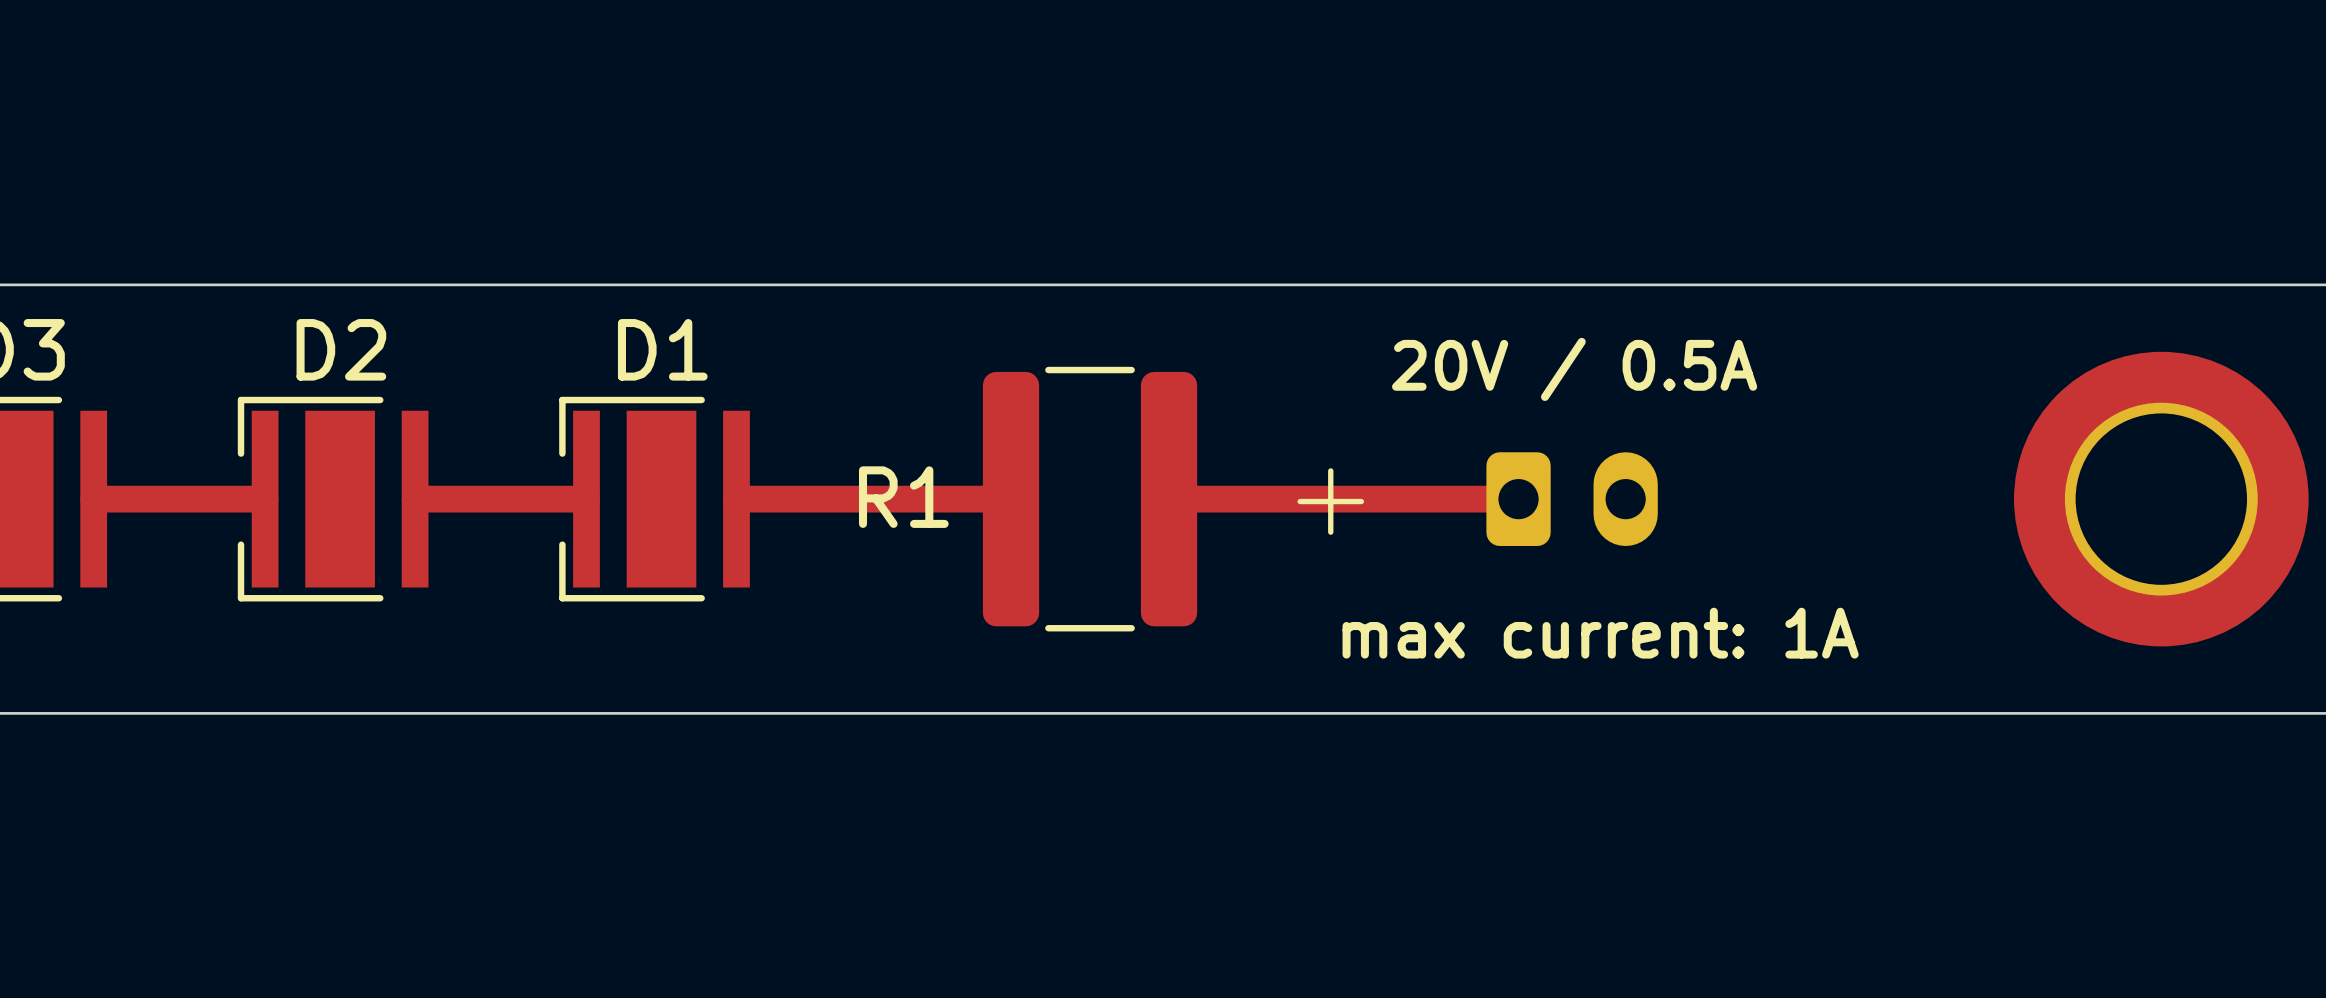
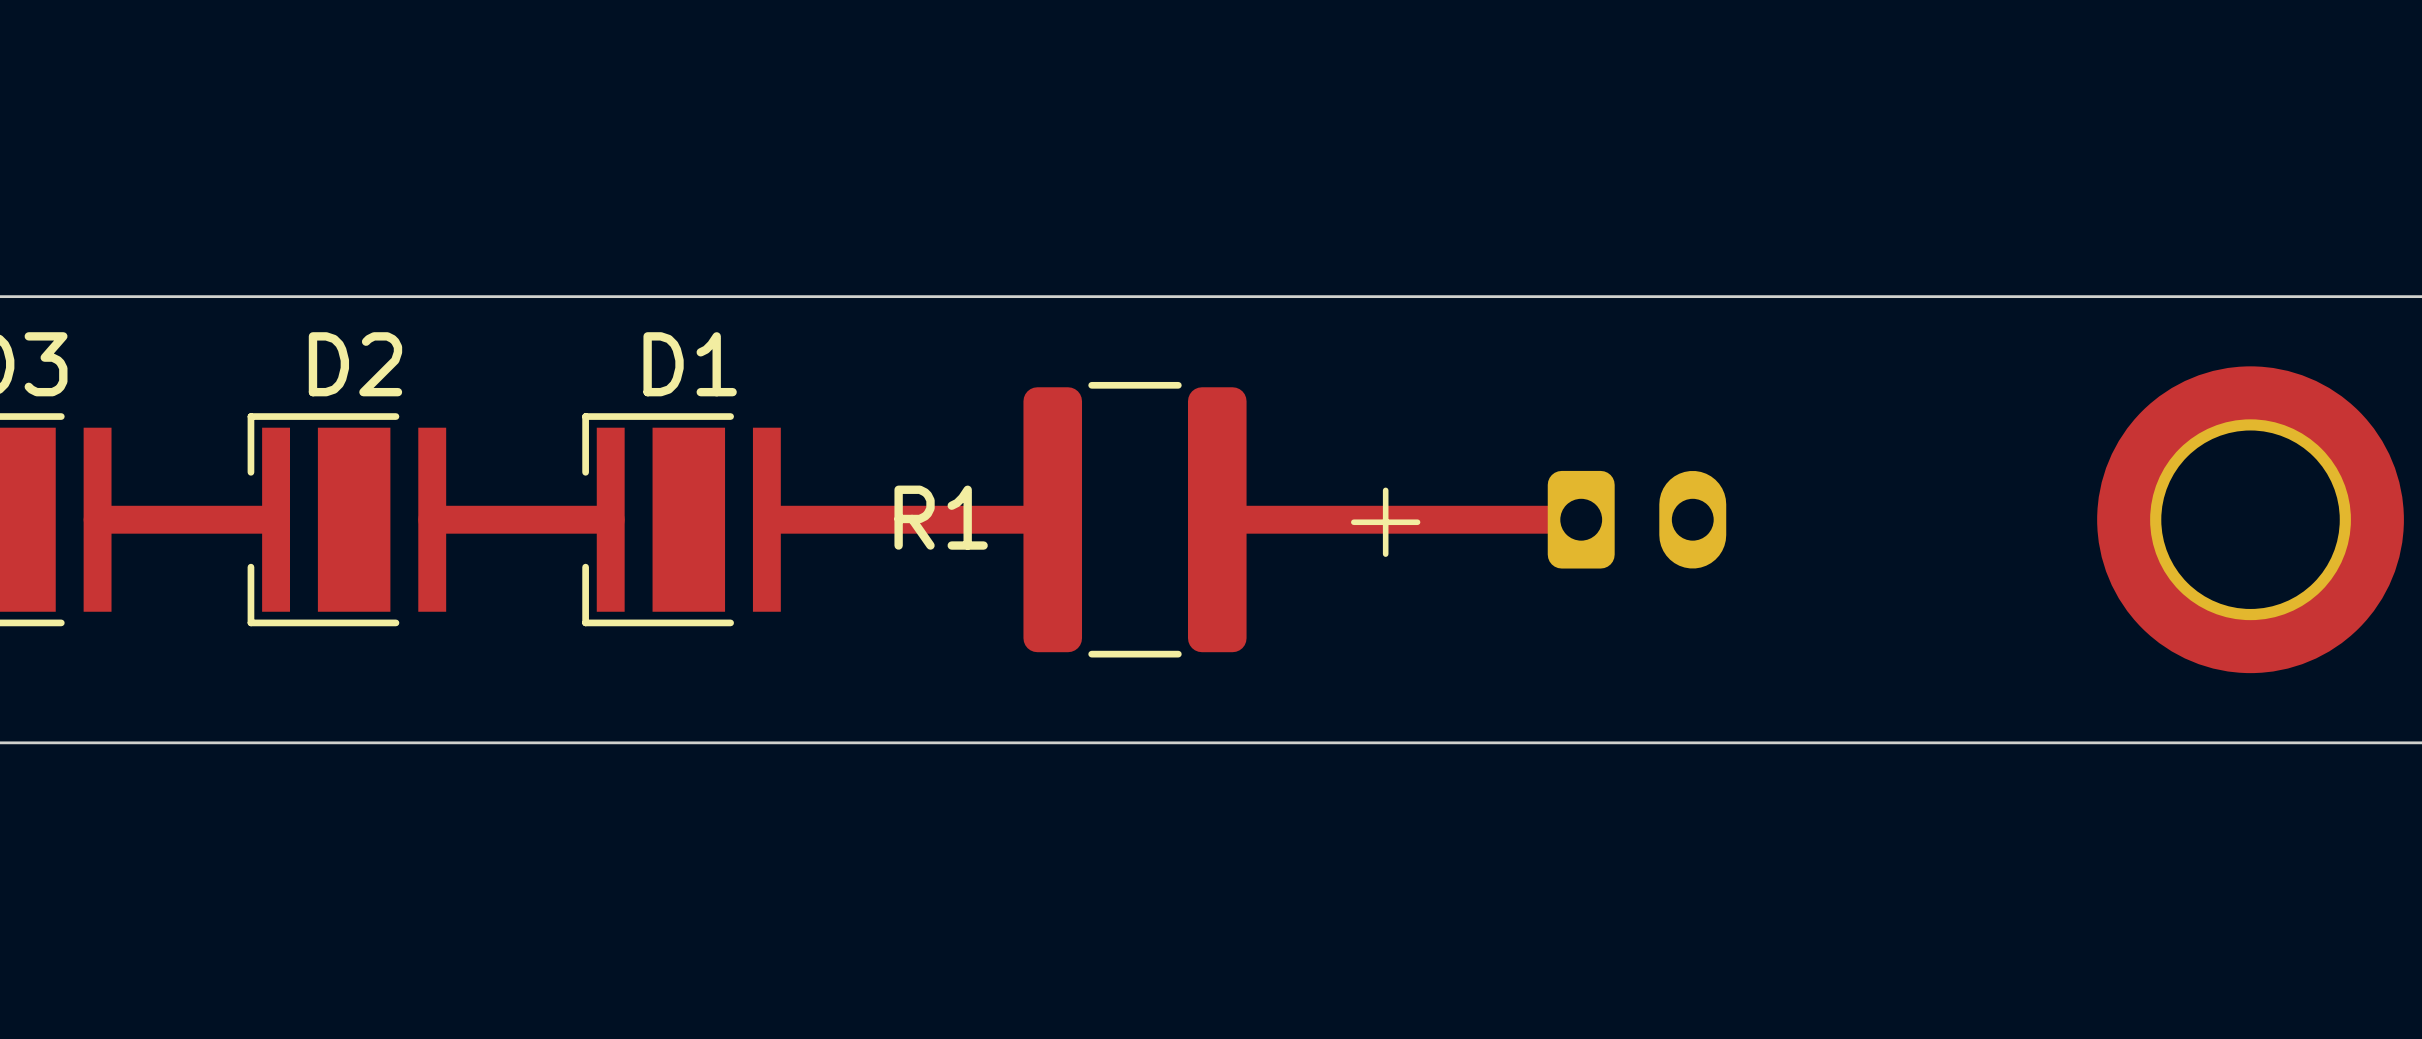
text: 20V / 0.5A (1574, 369) -> none
text: max current: 1A (1600, 633) -> none

